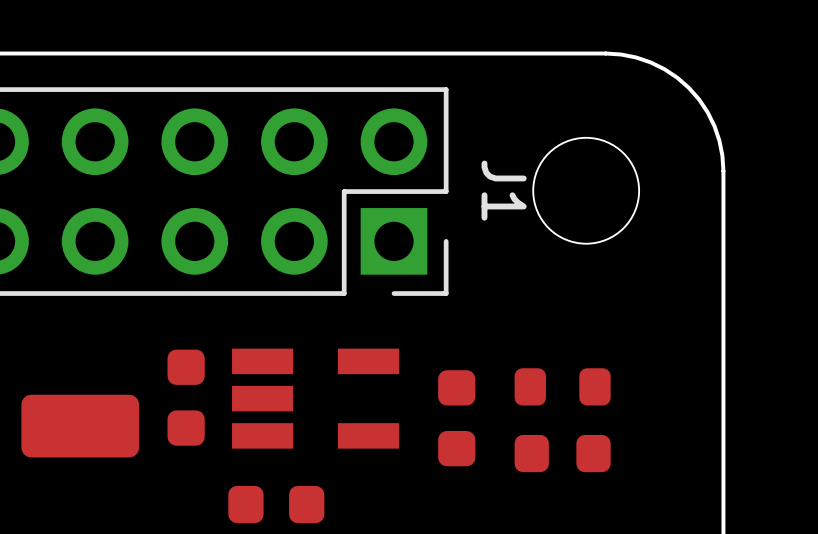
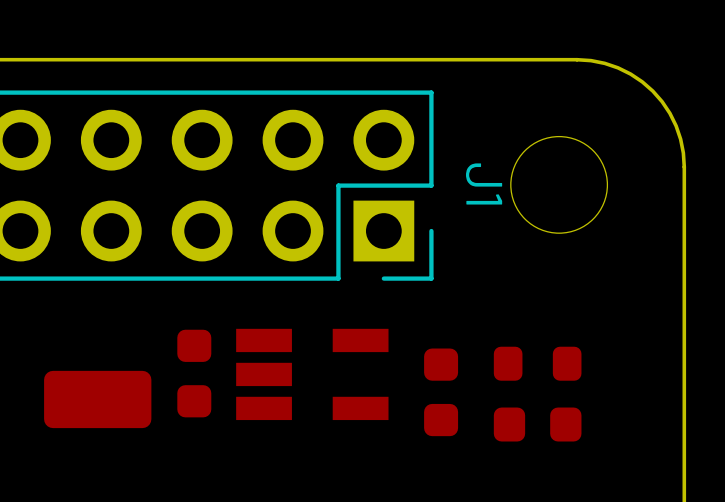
part: (276, 504) -> none

